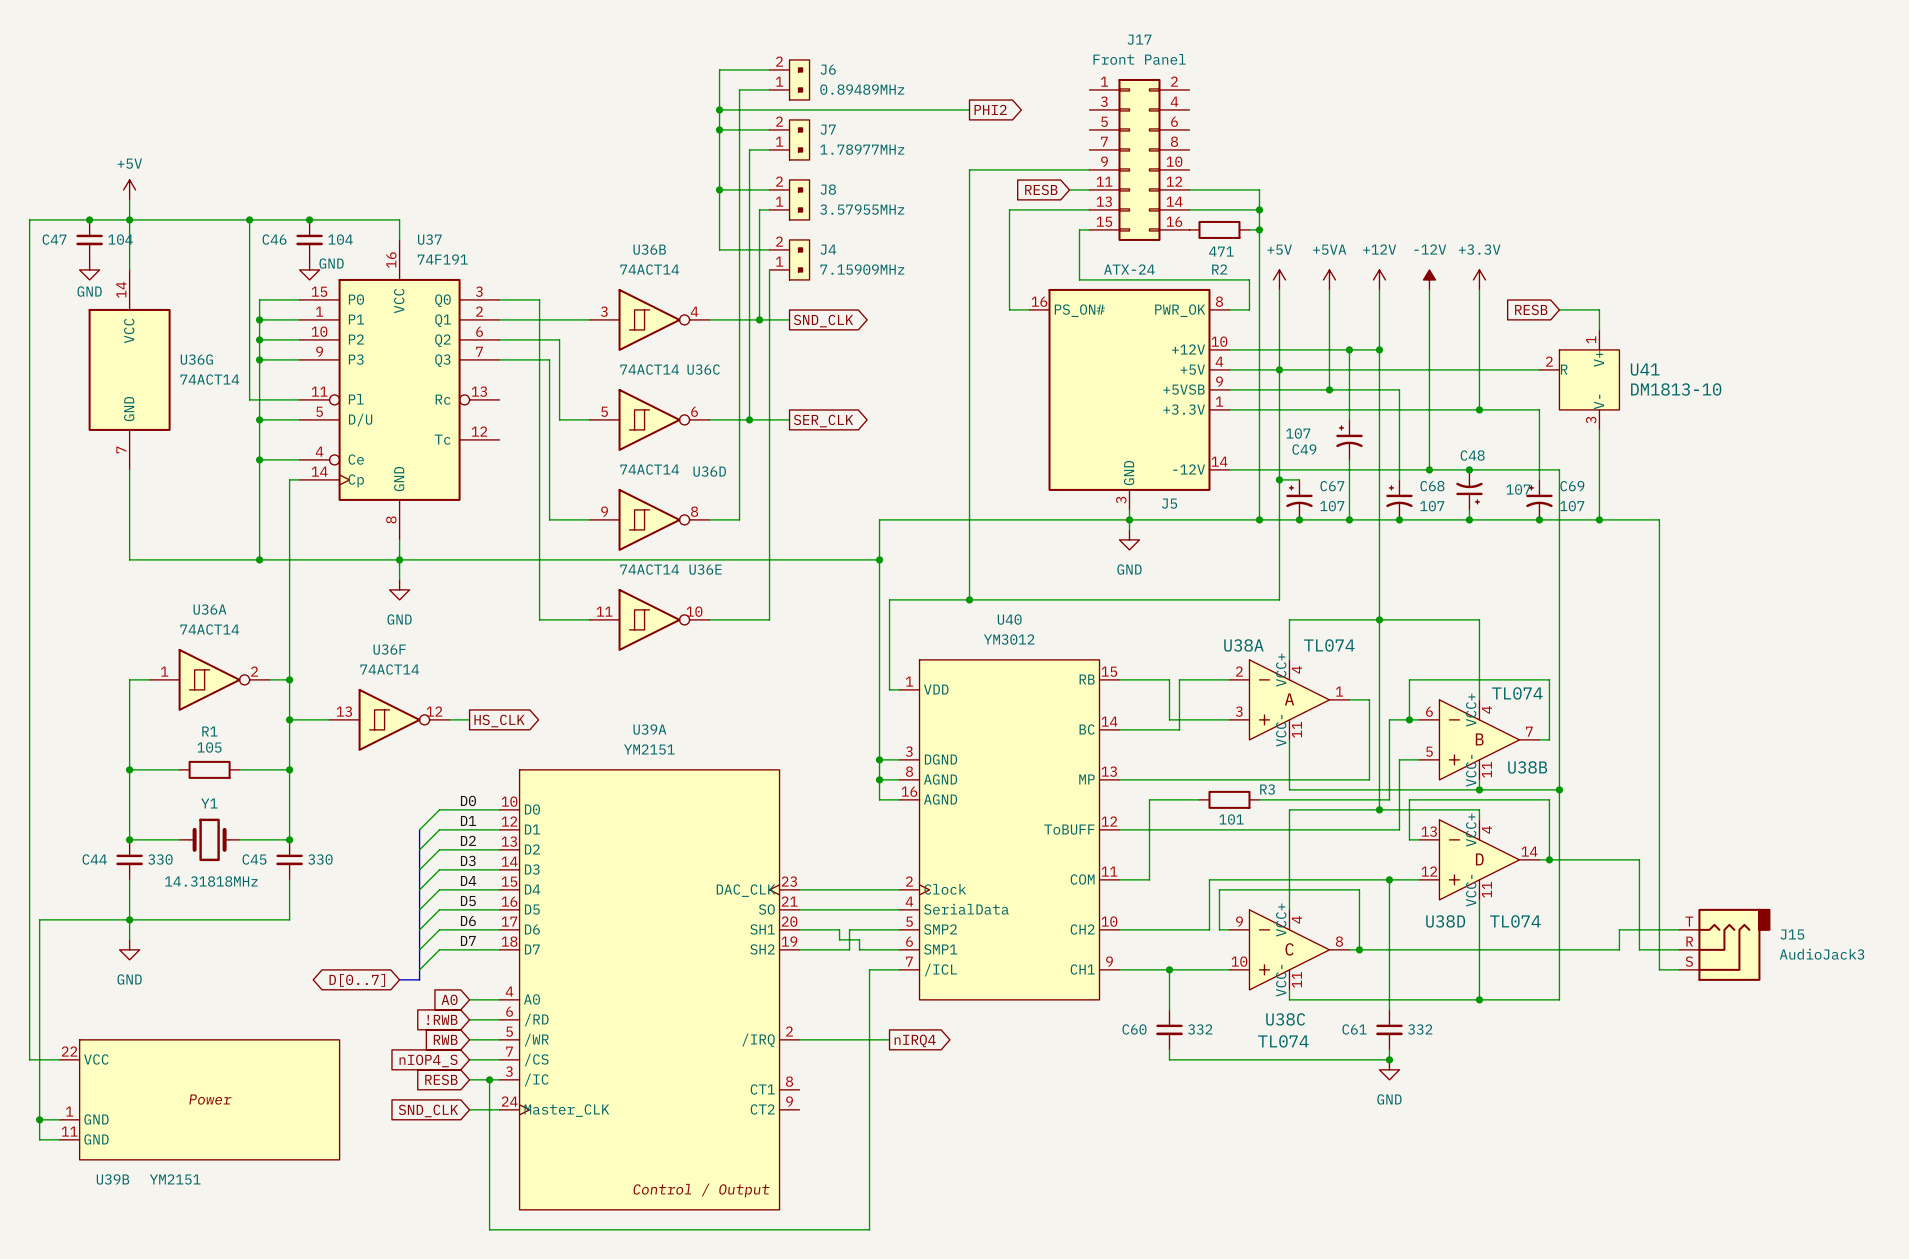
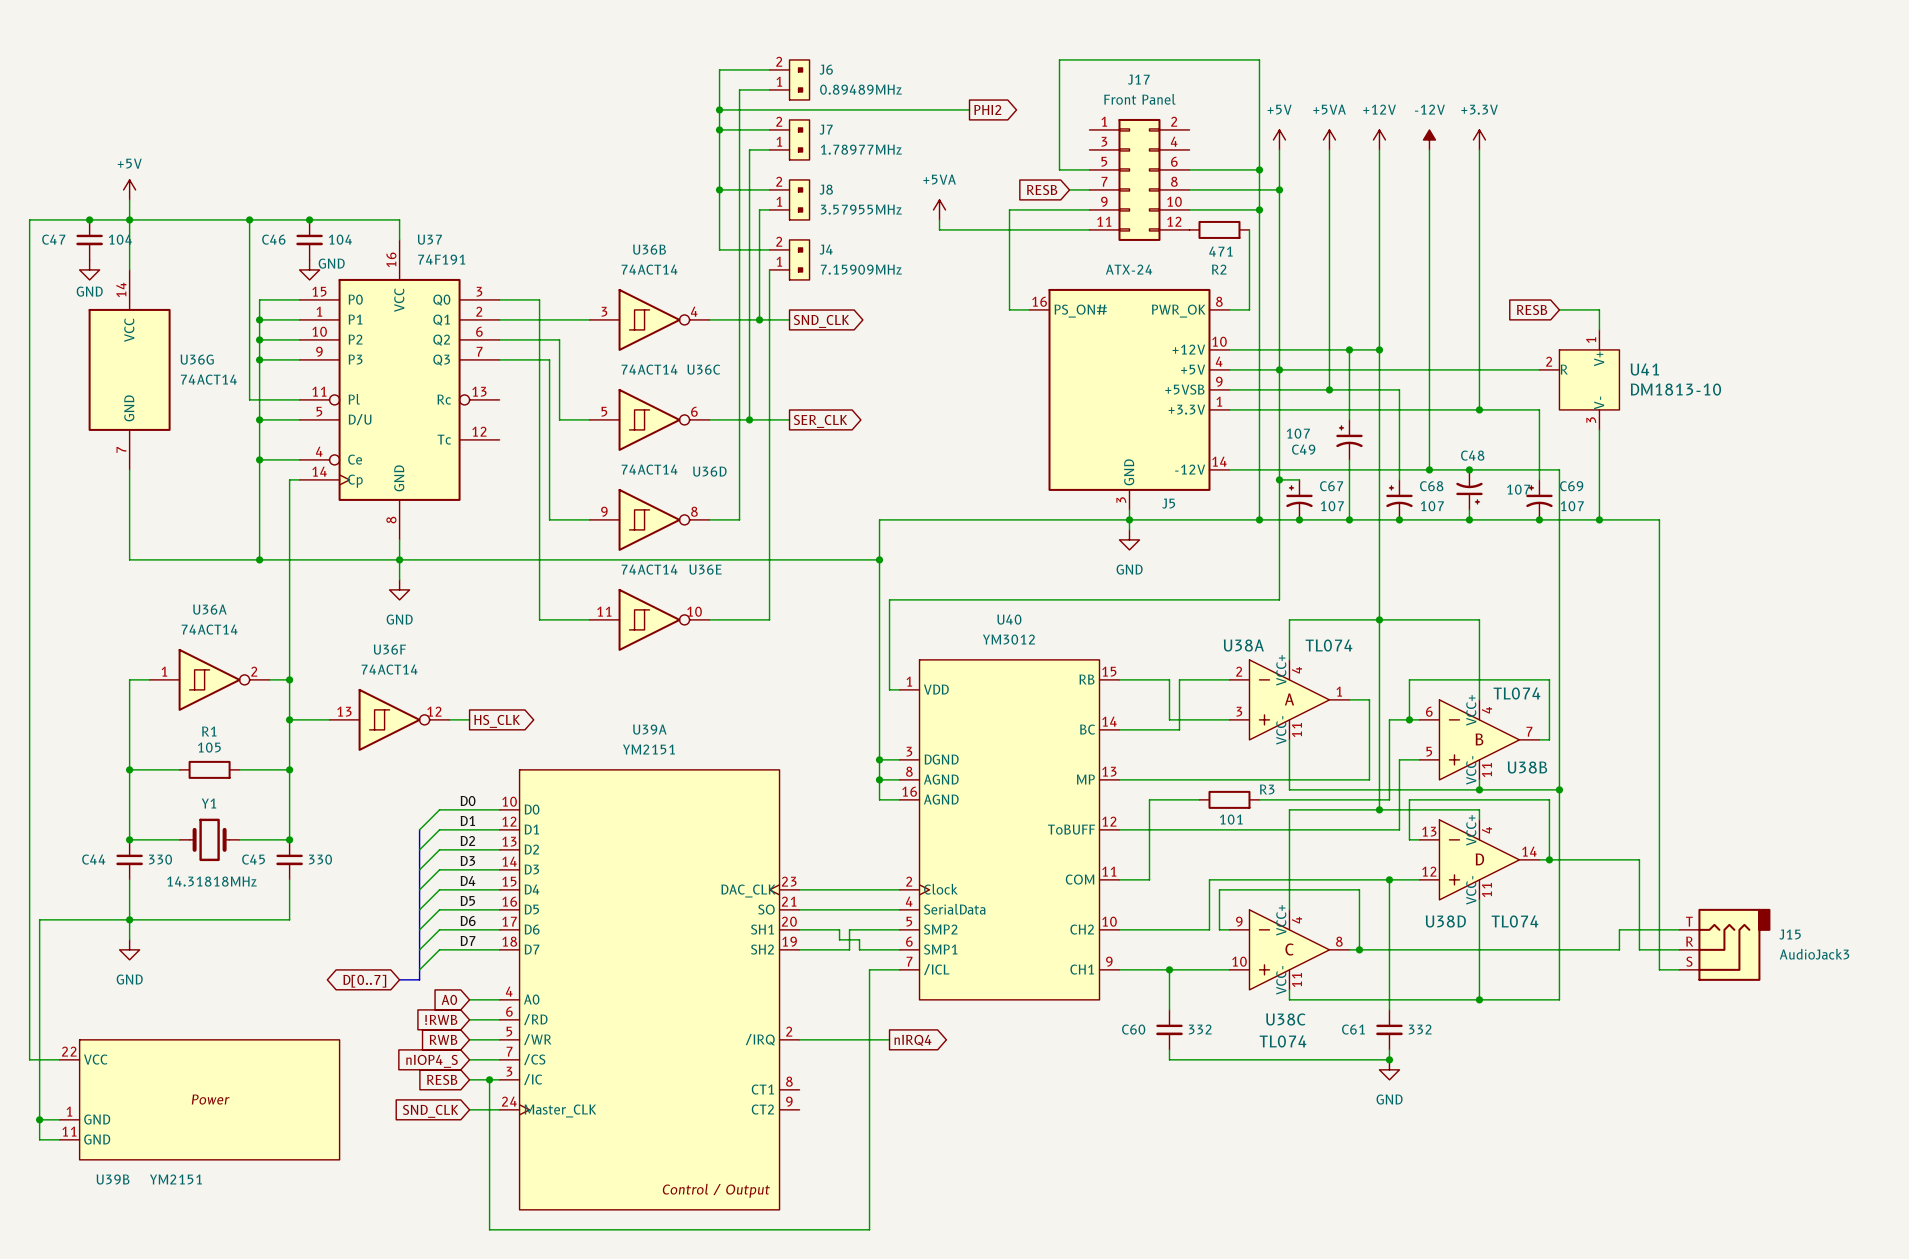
J17 name position: J17 (1139, 39) -> J17 (1138, 79)
J17 value position: Front Panel (1139, 59) -> Front Panel (1139, 99)
J17 symbol: [1089, 78, 1190, 241] -> [1089, 118, 1190, 241]
wire: none -> (1279, 149) (1279, 289)
wire: none -> (1329, 149) (1329, 289)
wire: none -> (1379, 149) (1379, 289)
wire: none -> (1429, 149) (1429, 289)
wire: none -> (1479, 149) (1479, 289)
wire: (1059, 169) (969, 169) (969, 599) -> (1059, 169) (1059, 59) (1259, 59) (1259, 189) (1279, 189)
wire: none -> (1189, 169) (1259, 169)
junction: none -> (1259, 169)
junction: none -> (1279, 189)
power symbol: none -> +5VA (939, 209)
wire: (1079, 229) (1079, 279) (1249, 279) -> (1079, 229) (939, 229) (939, 219)
wire: (1249, 229) (1259, 229) -> (1249, 229) (1249, 279)
junction: (1259, 229) -> none
power symbol position: +5V (1279, 279) -> +5V (1279, 139)
power symbol position: +5VA (1329, 279) -> +5VA (1329, 139)
power symbol position: +12V (1379, 279) -> +12V (1379, 139)
power symbol position: -12V (1429, 279) -> -12V (1429, 139)
power symbol position: +3.3V (1479, 279) -> +3.3V (1479, 139)
junction: (969, 599) -> none

